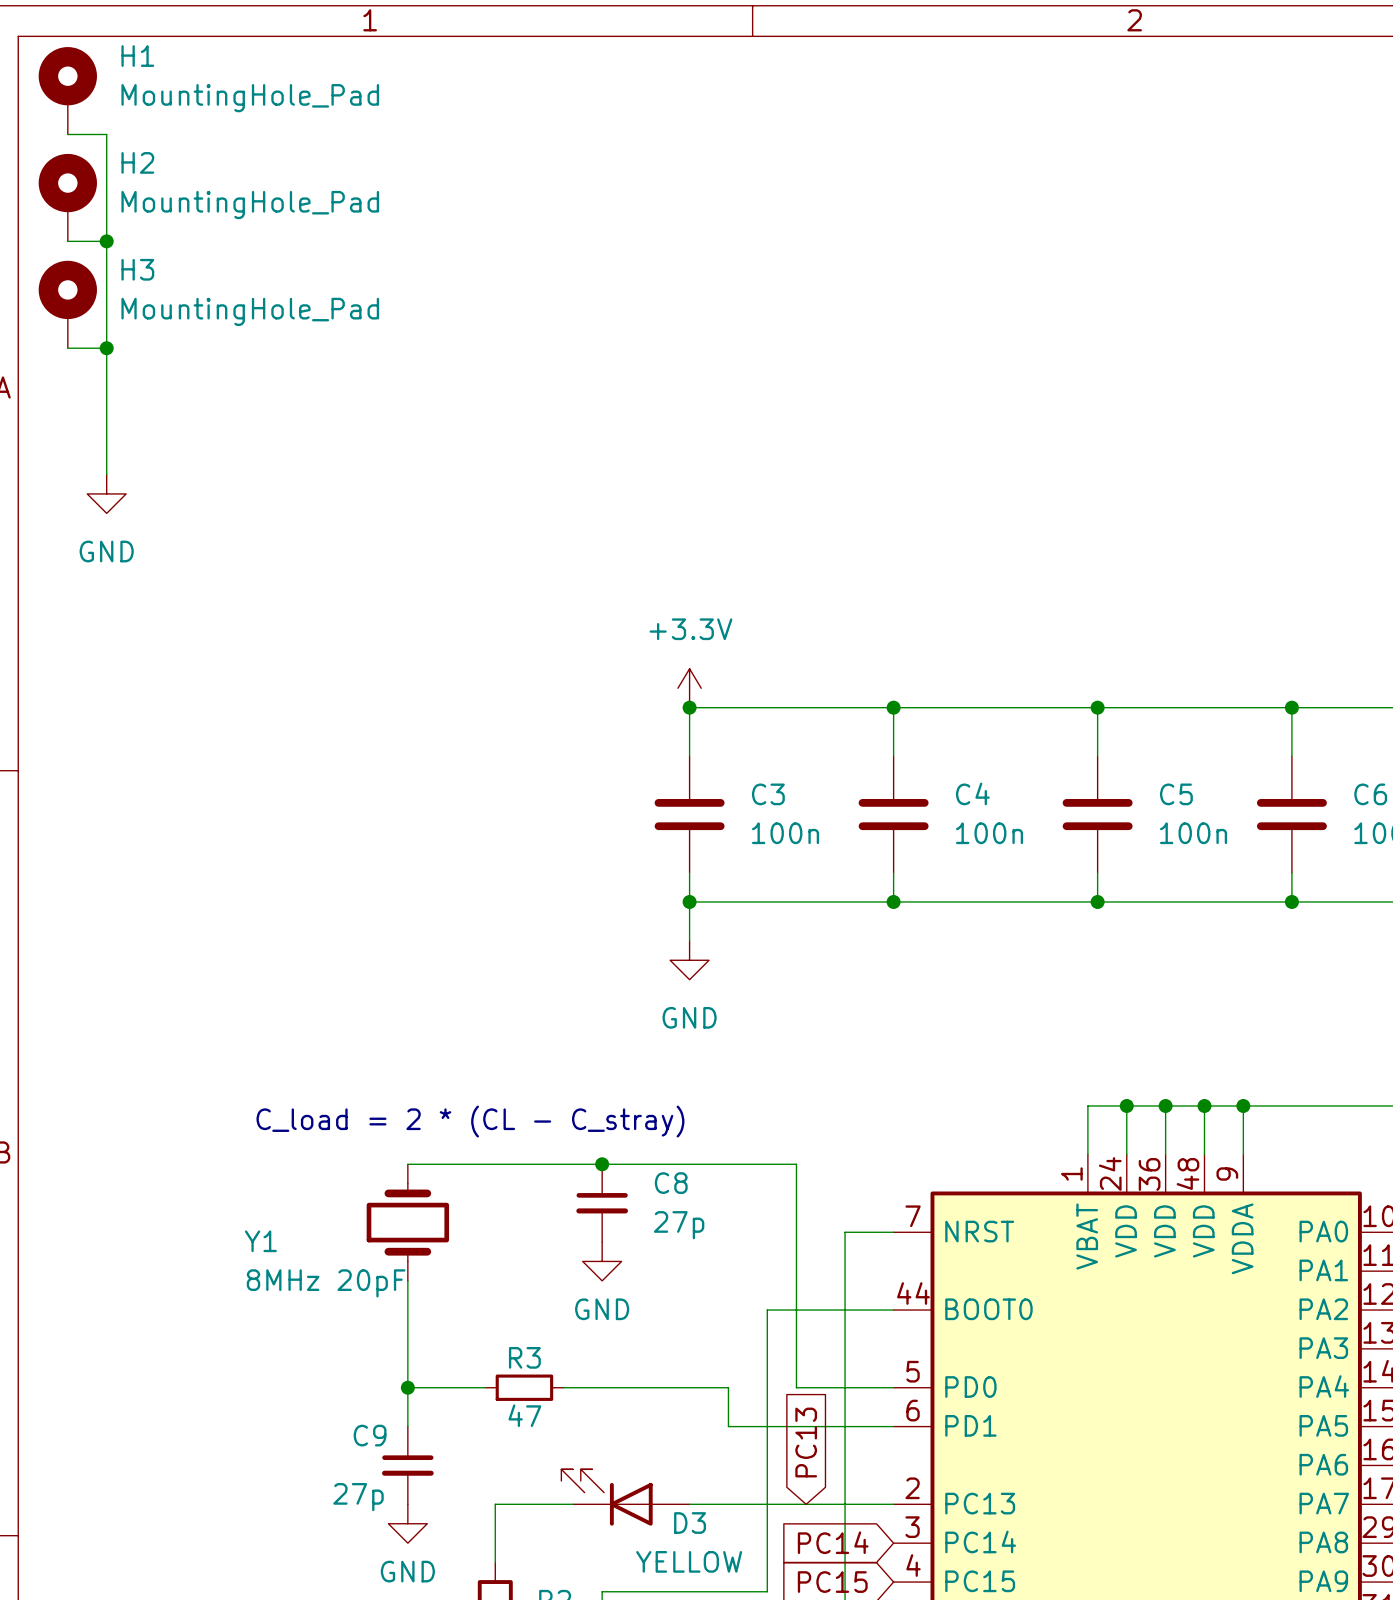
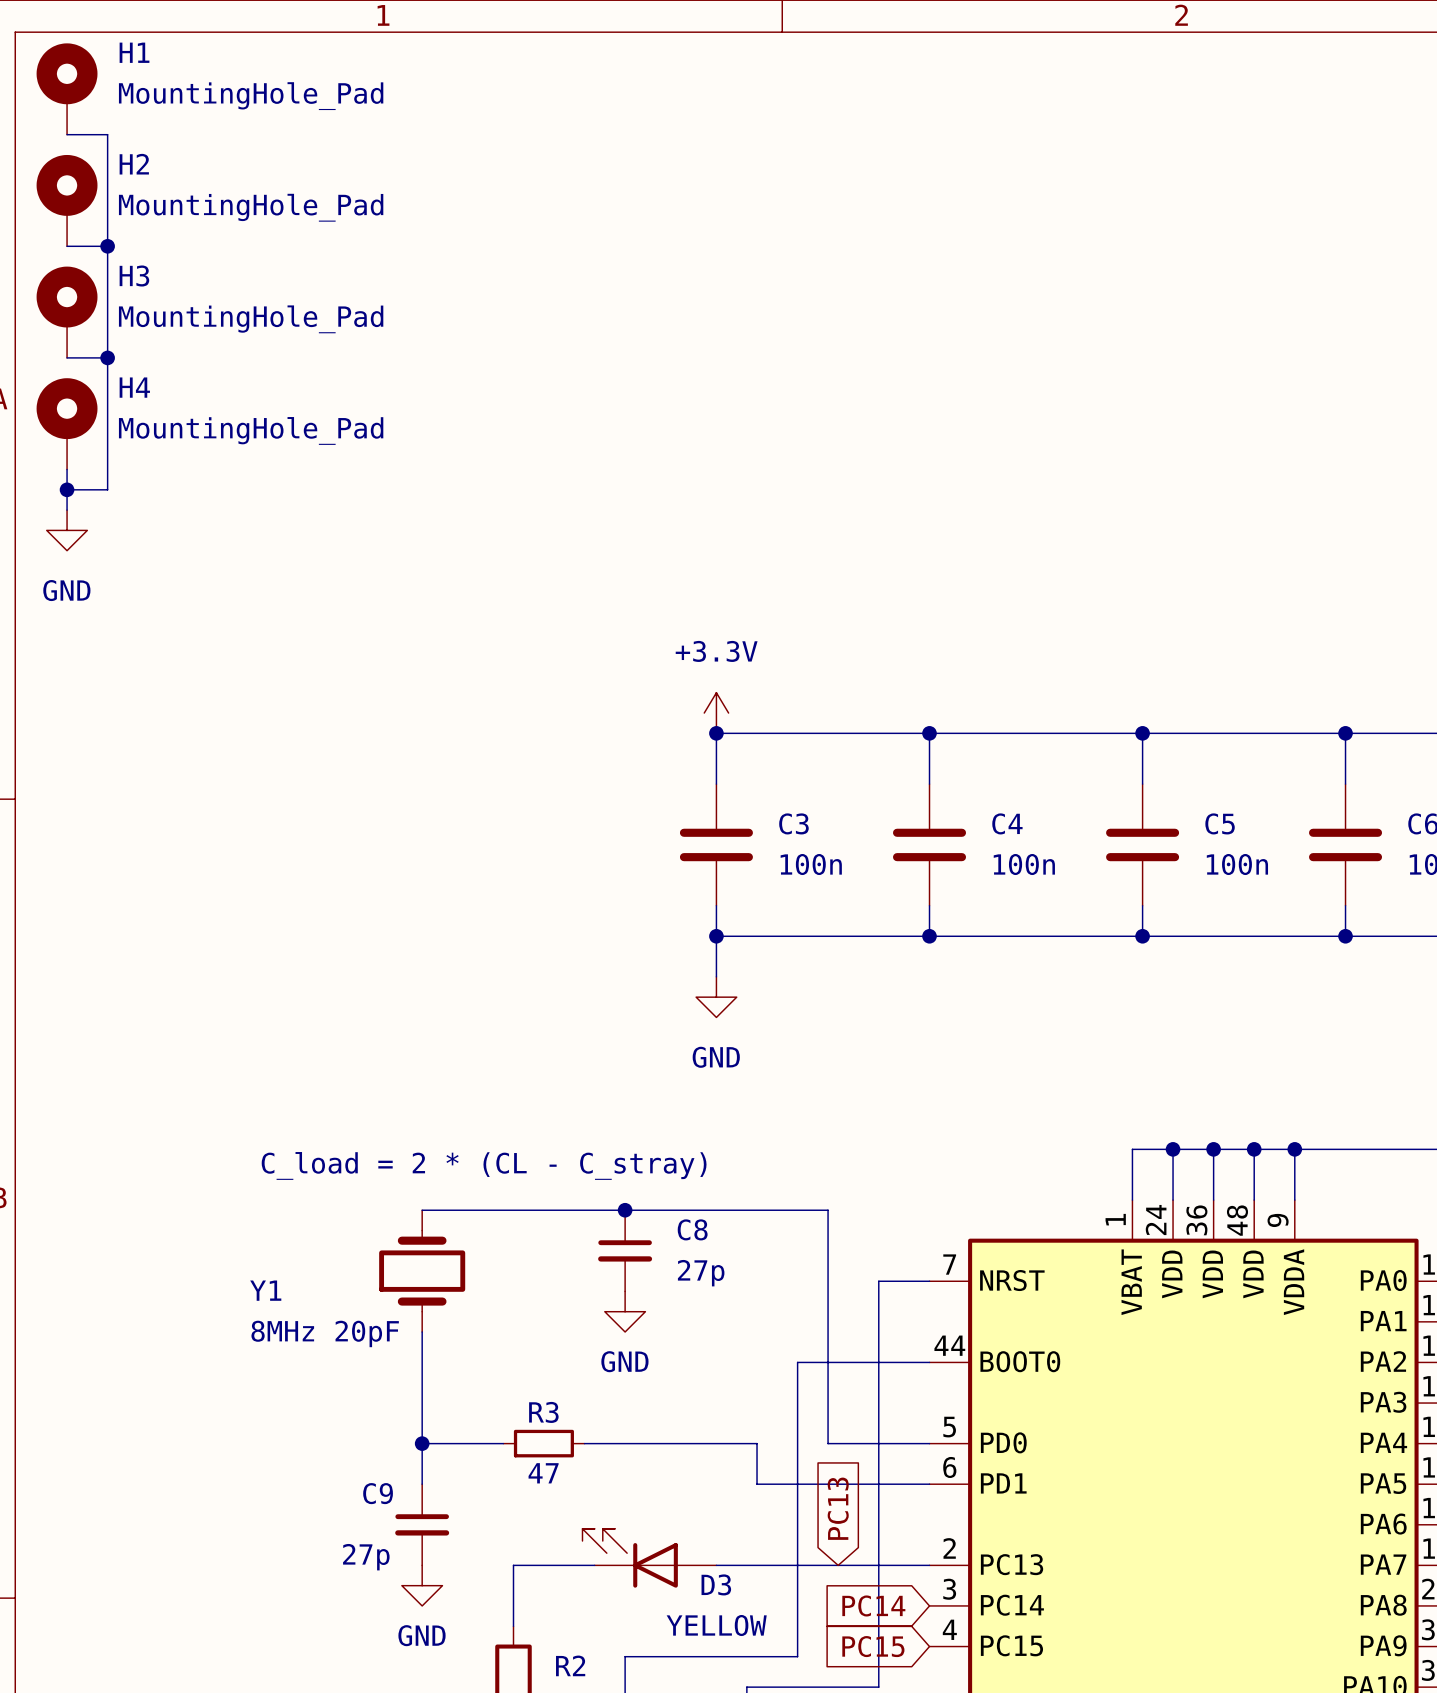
H4: none -> MountingHole_Pad (67, 423)
wire: none -> (67, 469) (67, 510)
wire: none -> (67, 489) (107, 489)
junction: none -> (67, 489)
power symbol position: GND (106, 493) -> GND (67, 530)

